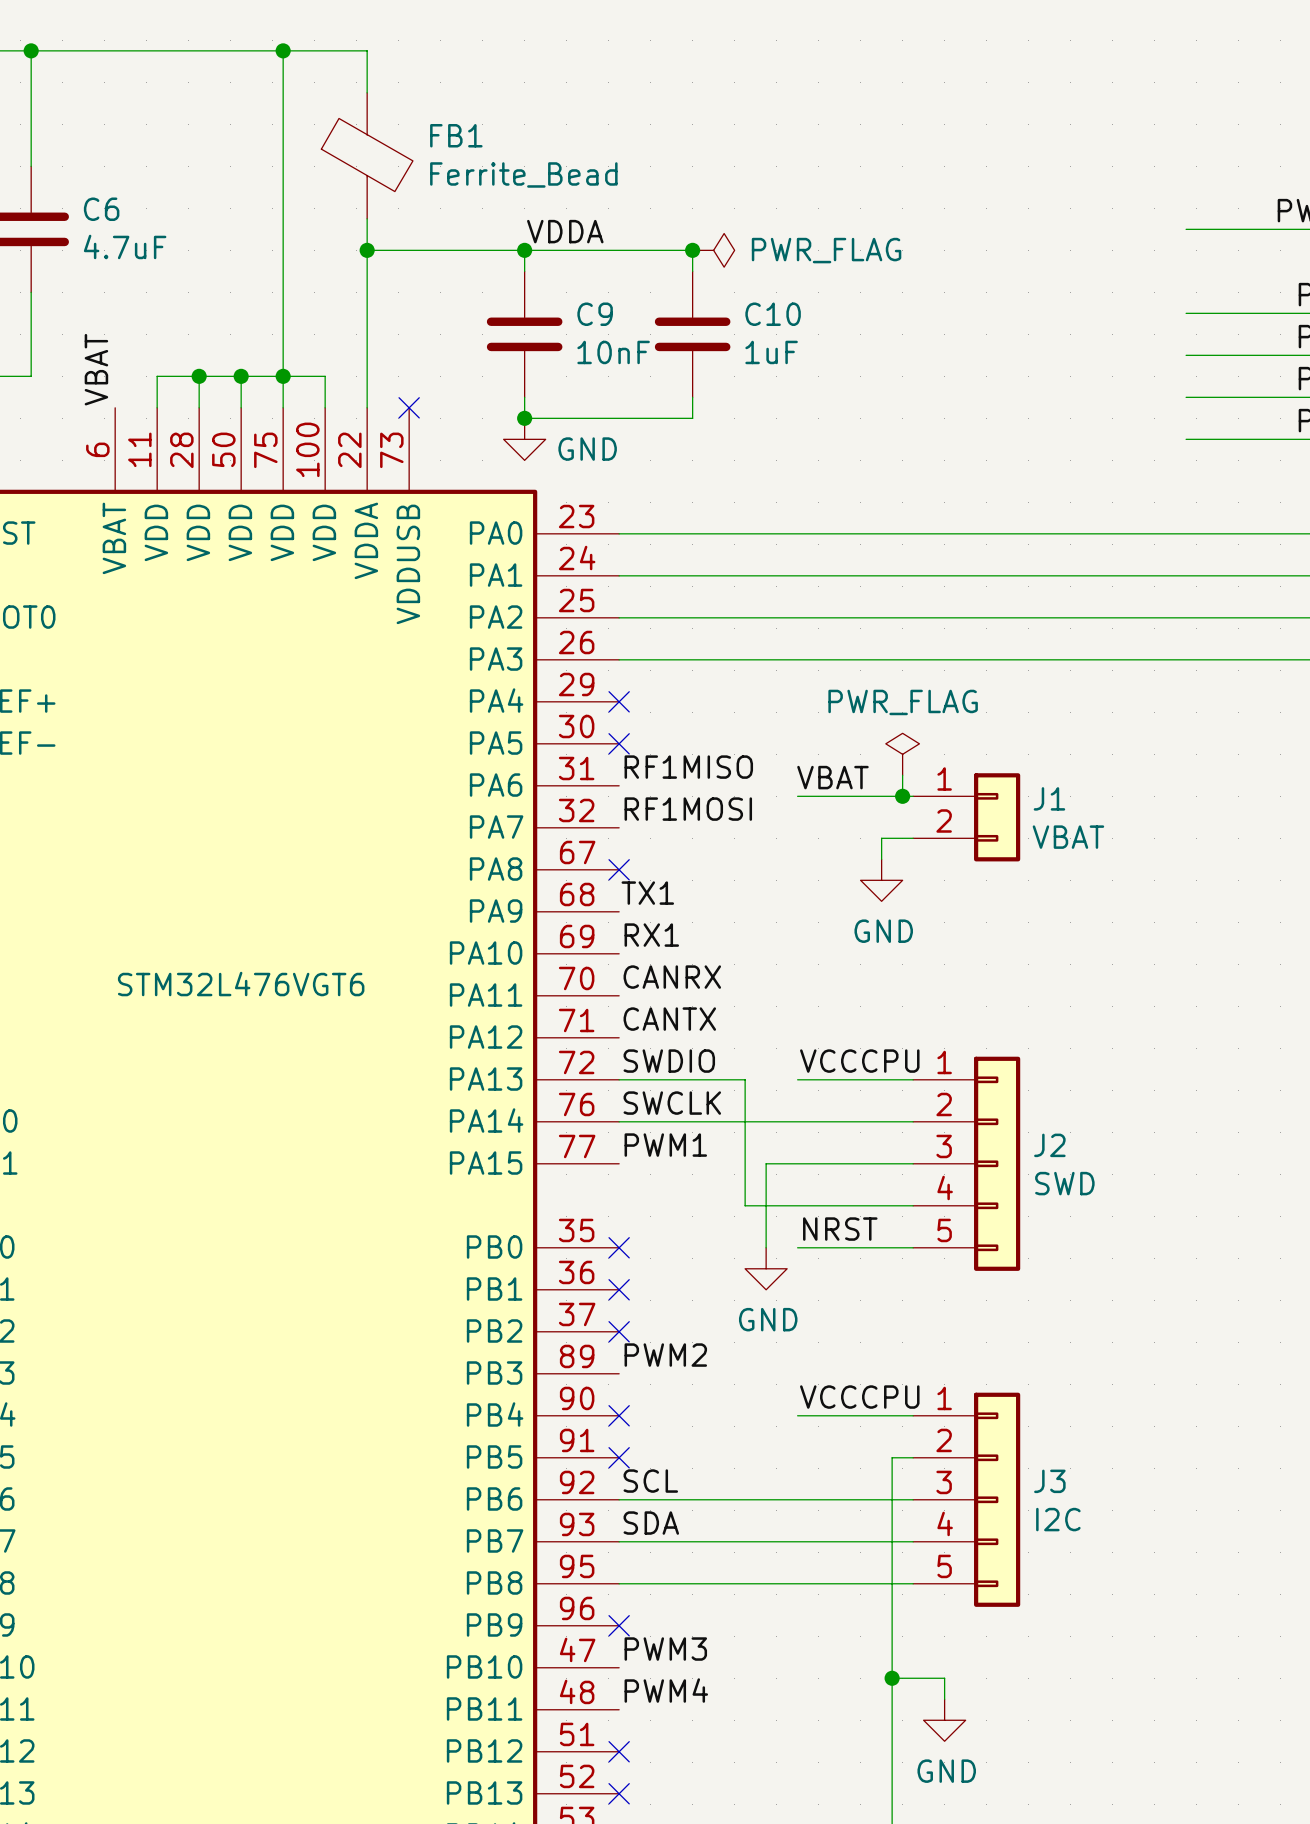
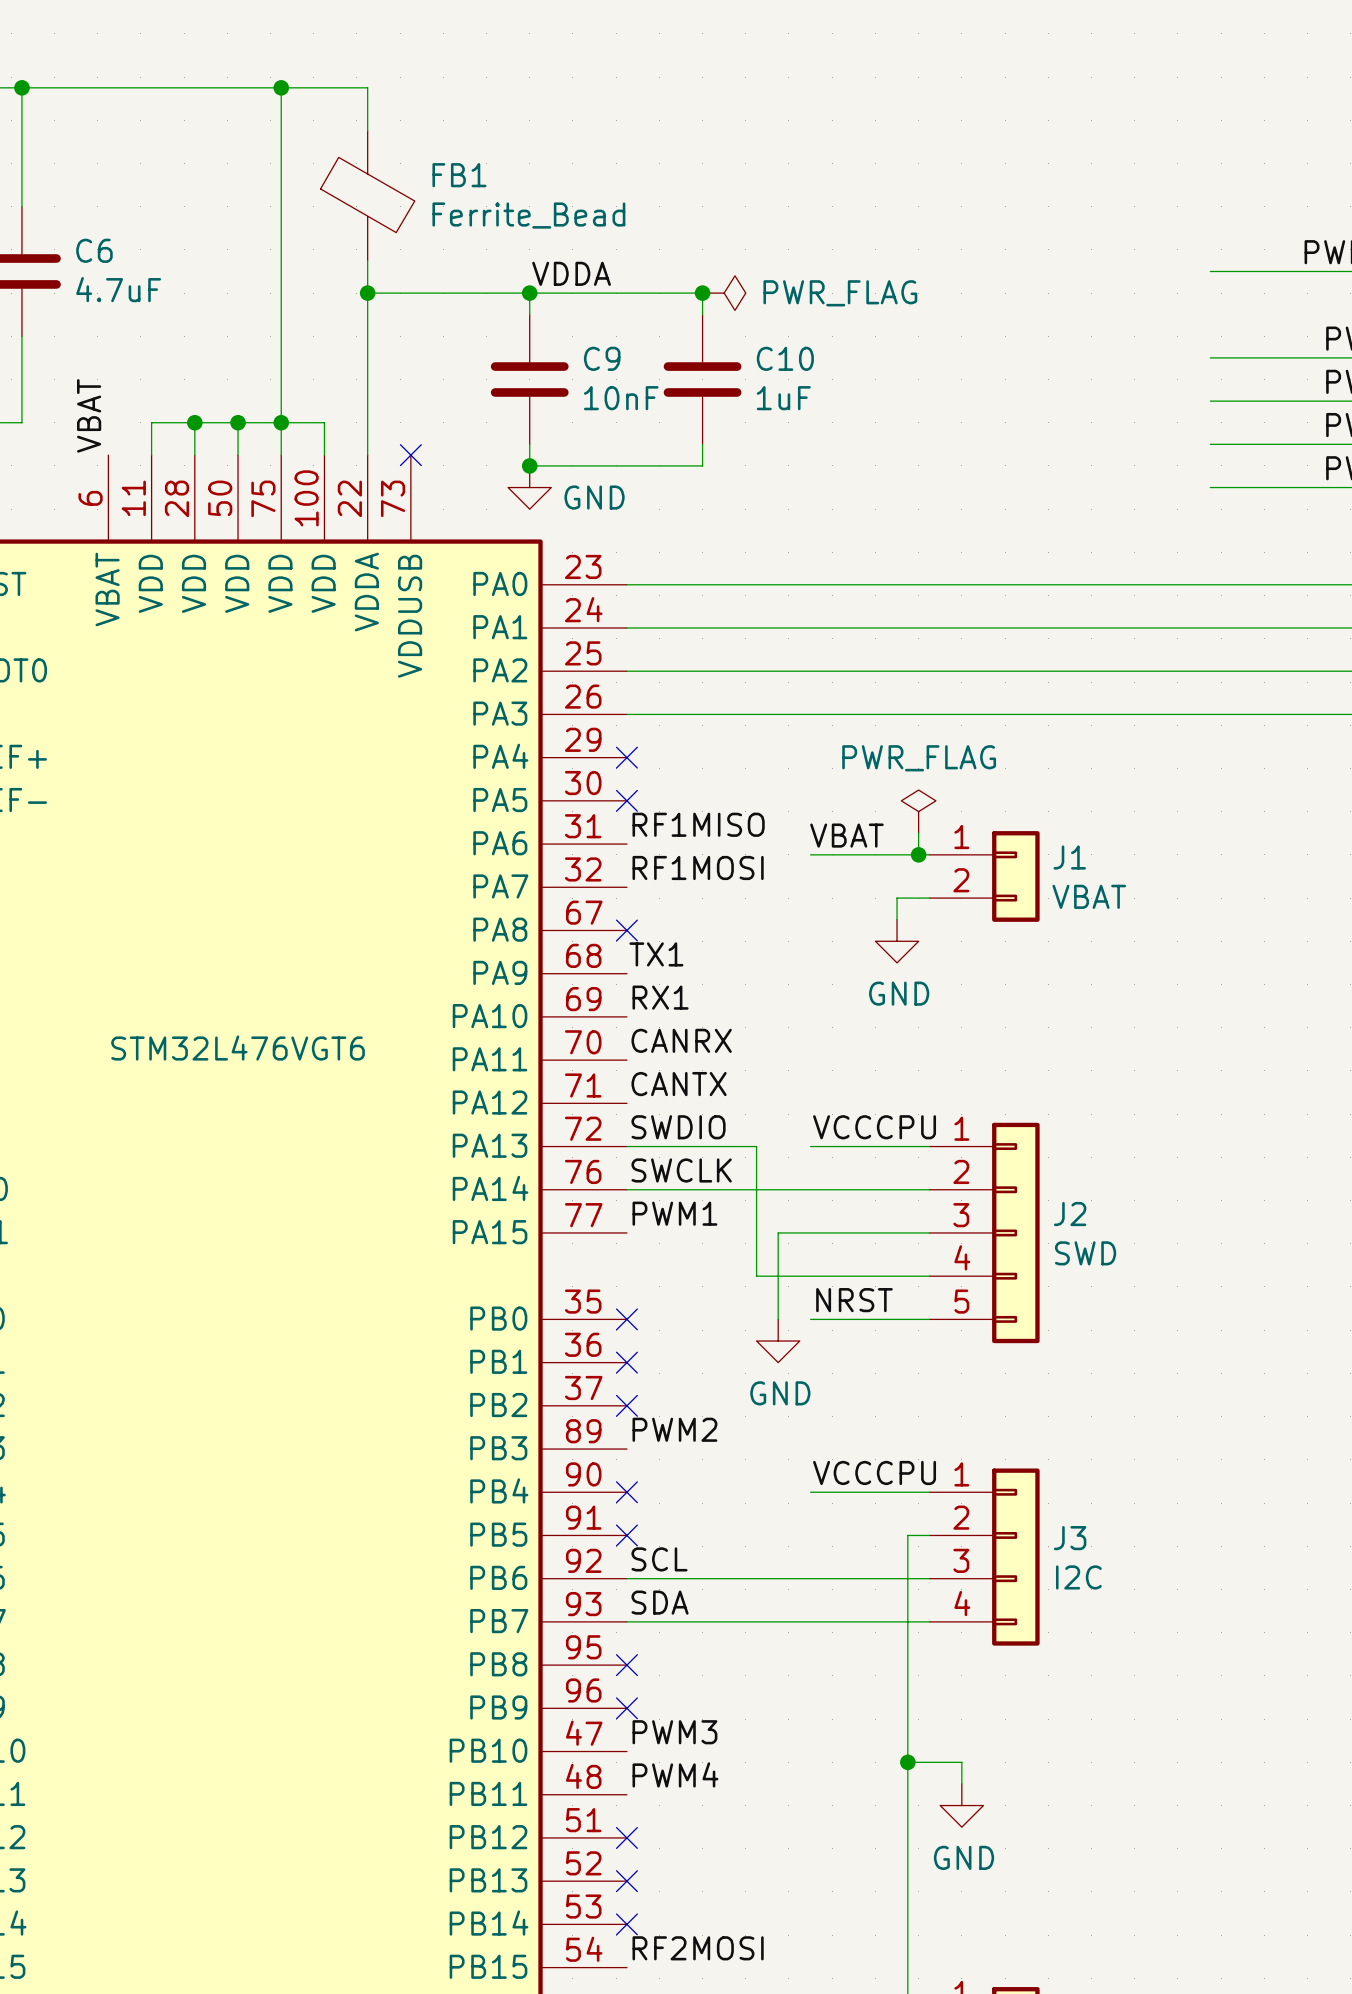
J3 symbol: [913, 1392, 1021, 1607] -> [929, 1468, 1040, 1646]
wire: (619, 1583) (913, 1583) -> none
no-connect mark: none -> (626, 1665)

